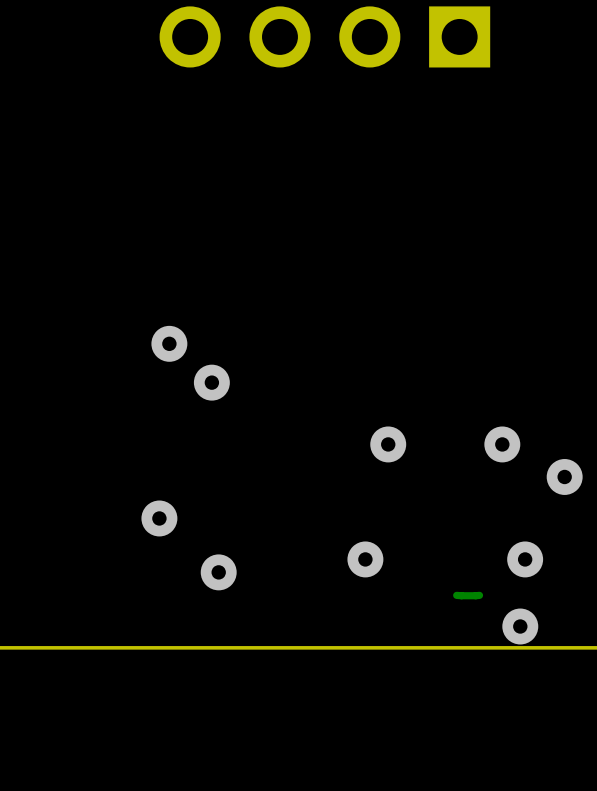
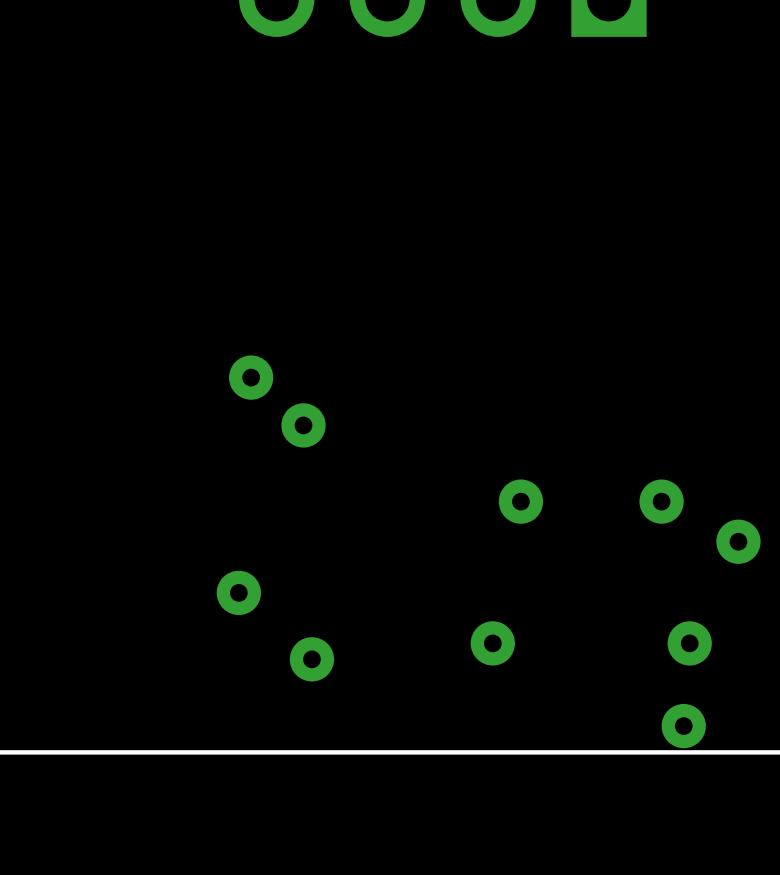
track: (479, 595) (456, 595) -> none

